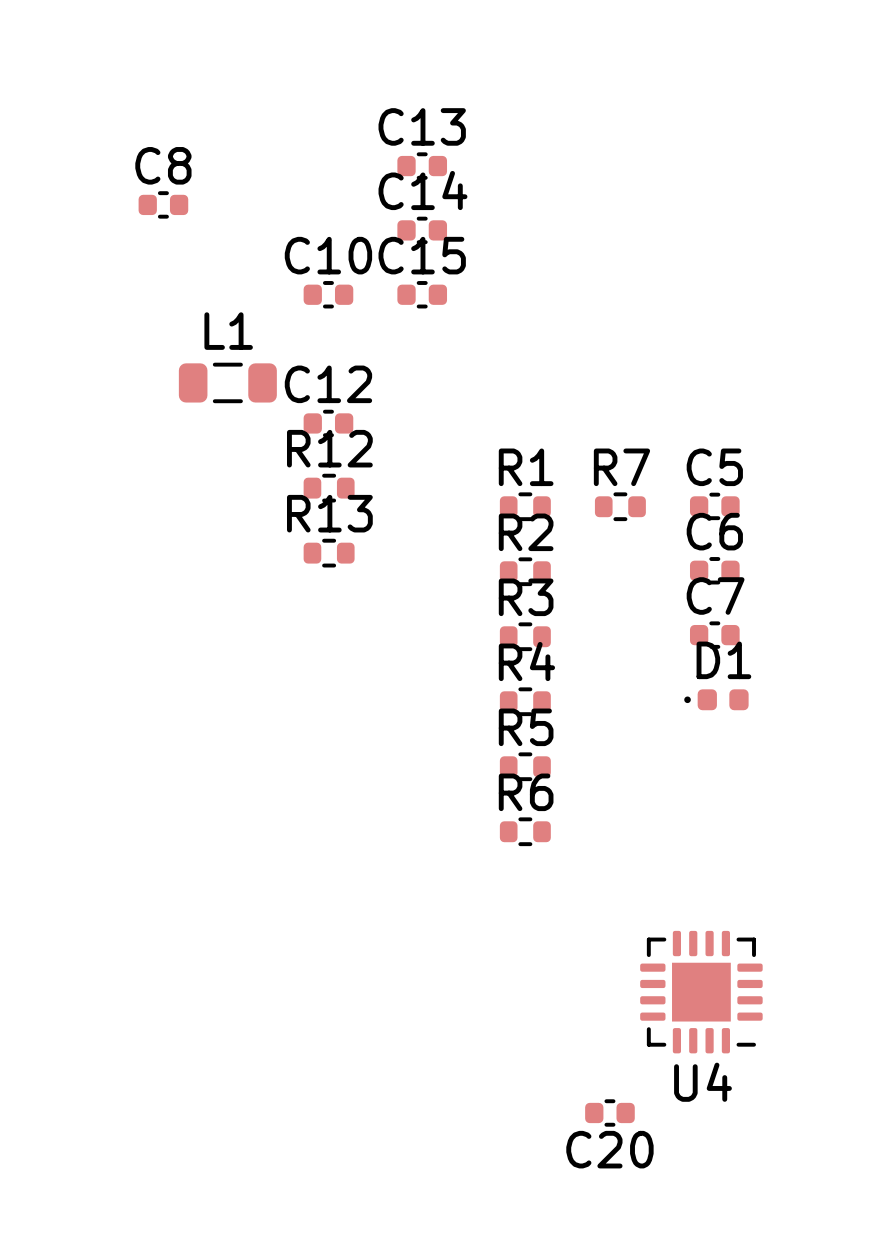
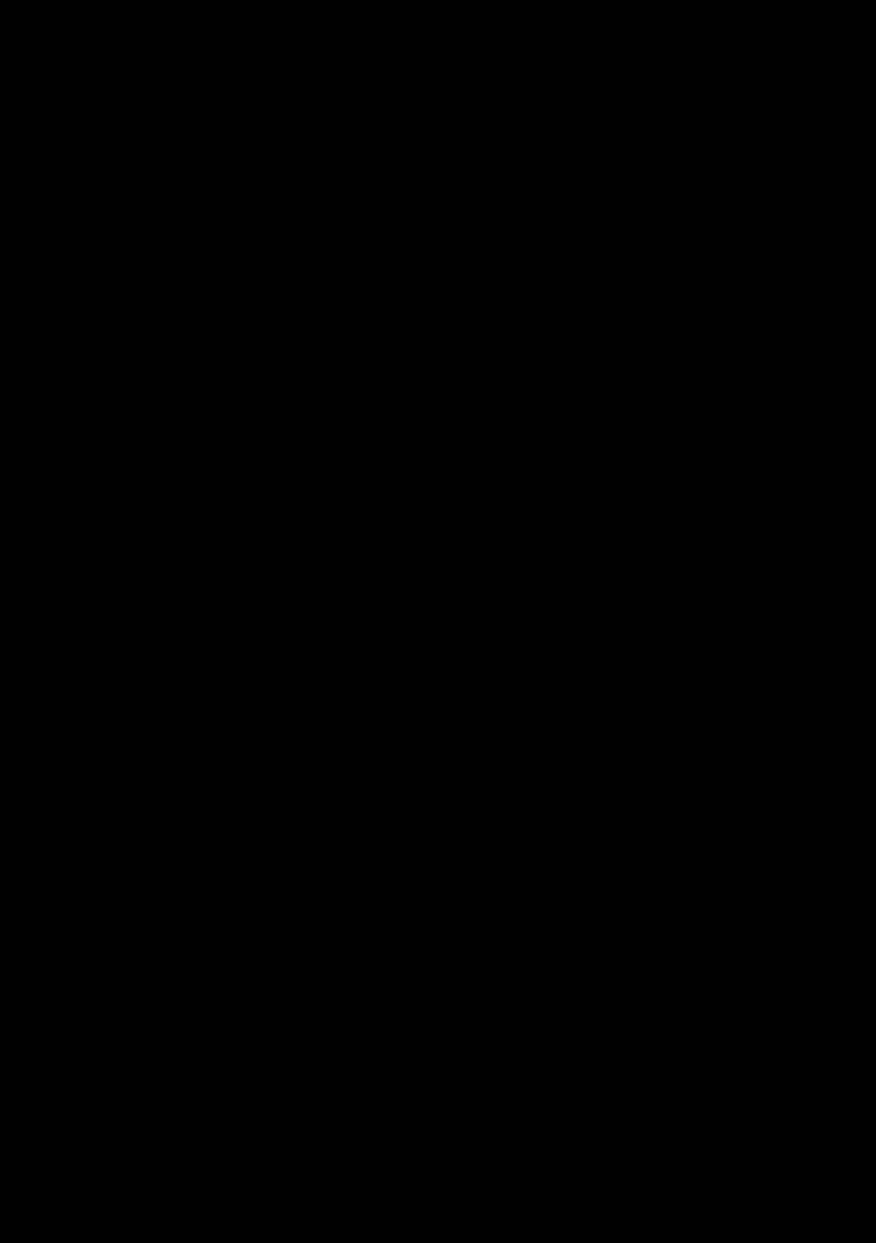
C13: (422, 166) -> none
C8: (163, 204) -> none
C14: (422, 230) -> none
C10: (328, 294) -> none
C15: (422, 294) -> none
L1: (227, 382) -> none
C12: (328, 423) -> none
R12: (329, 488) -> none
R1: (525, 506) -> none
R7: (620, 506) -> none
C5: (714, 506) -> none
R13: (329, 553) -> none
C6: (714, 570) -> none
R2: (525, 571) -> none
C7: (714, 635) -> none
R3: (525, 636) -> none
D1: (716, 699) -> none
R4: (525, 701) -> none
R5: (525, 766) -> none
R6: (525, 831) -> none
U4: (701, 992) -> none
C20: (609, 1112) -> none

